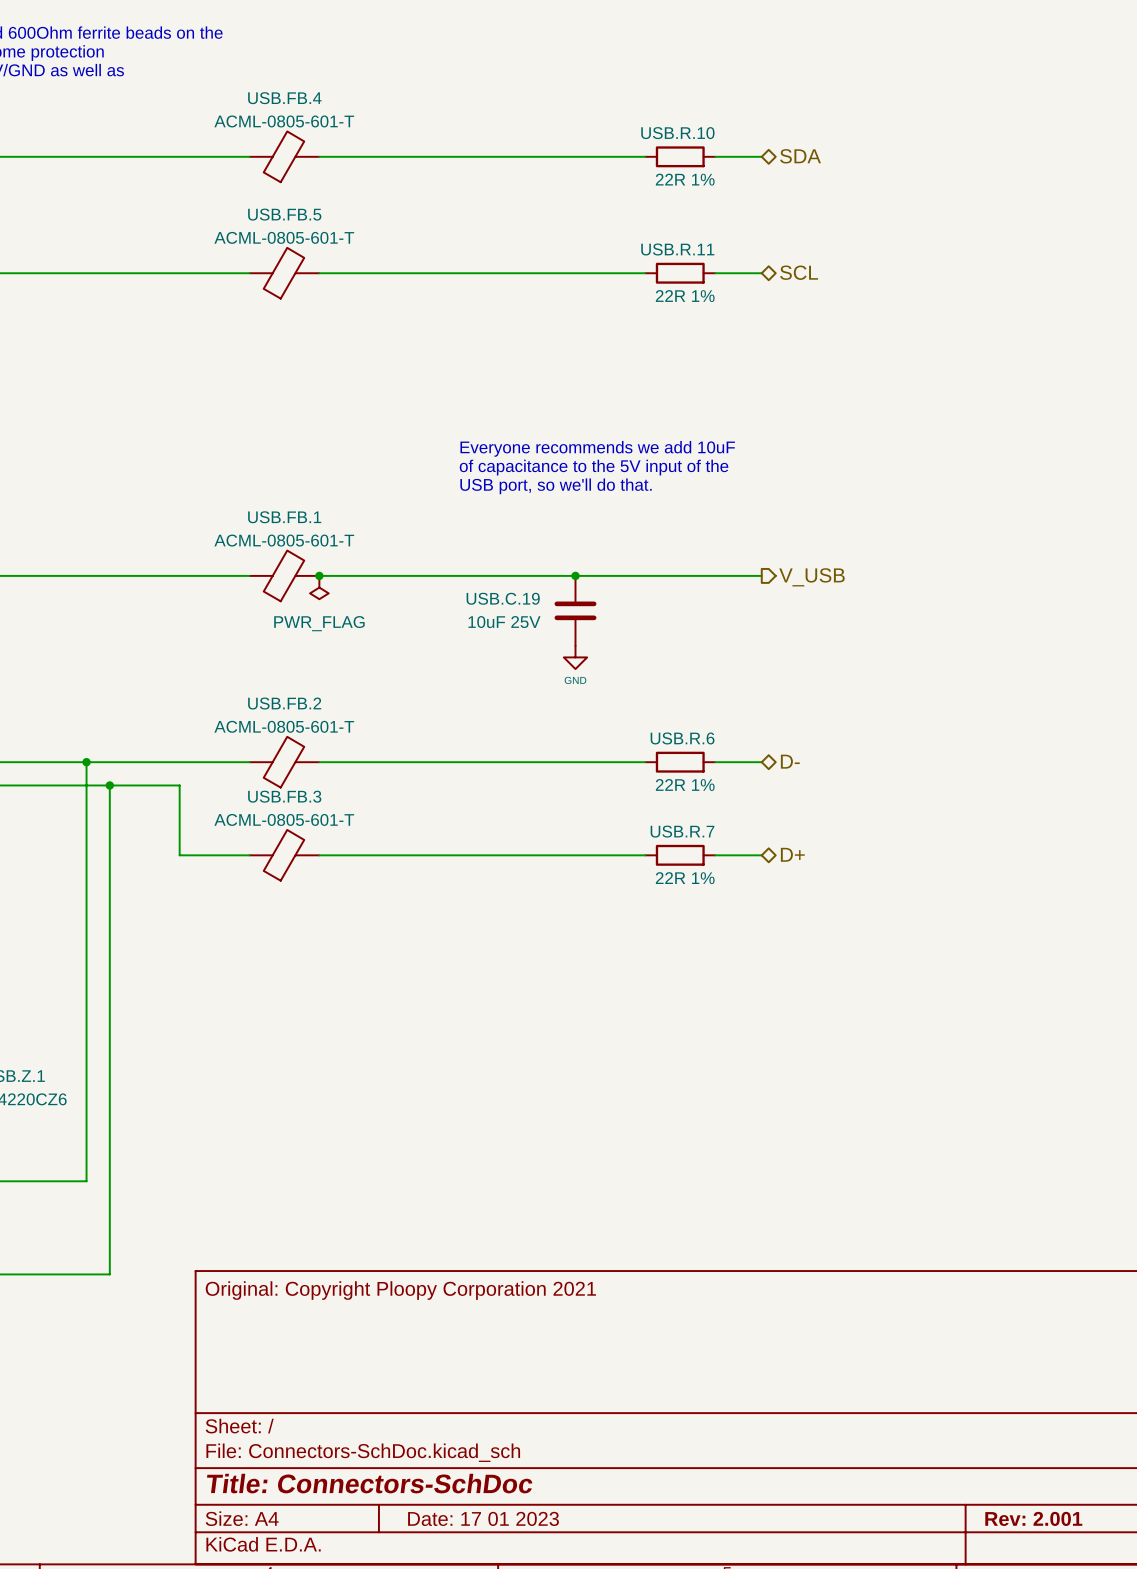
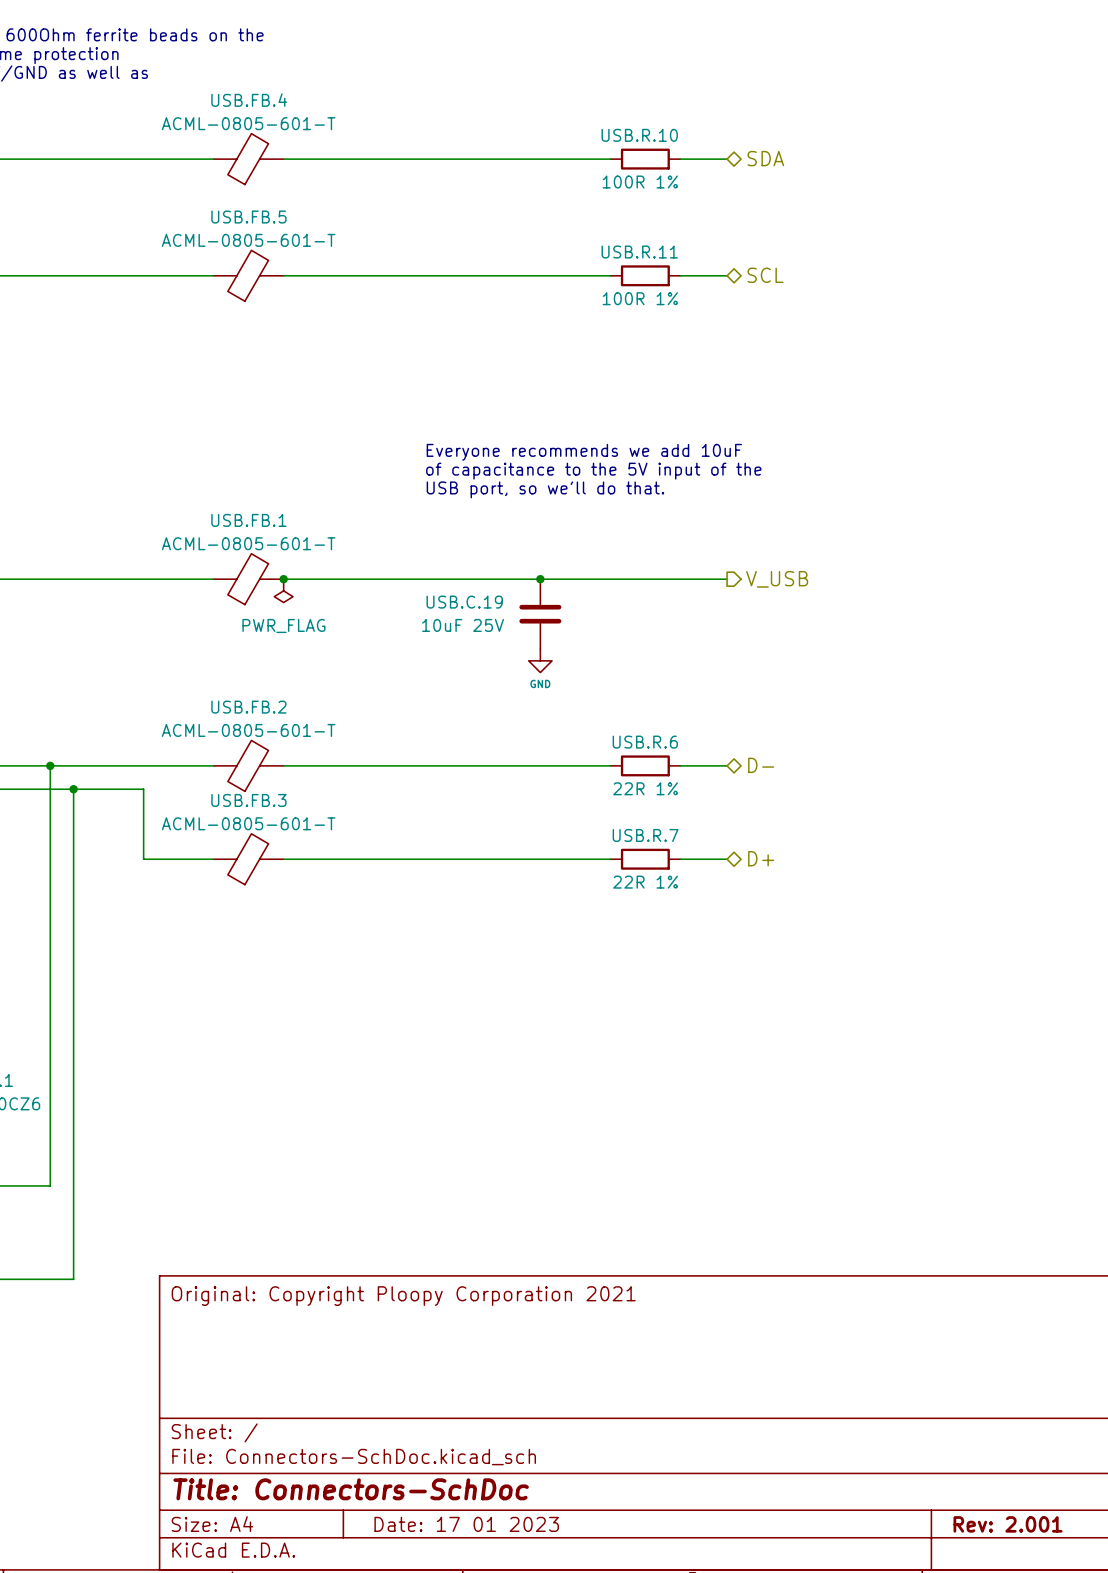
USB.R.10 value: 22R 1% (685, 179) -> 100R 1% (640, 182)
USB.R.11 value: 22R 1% (685, 296) -> 100R 1% (640, 298)

